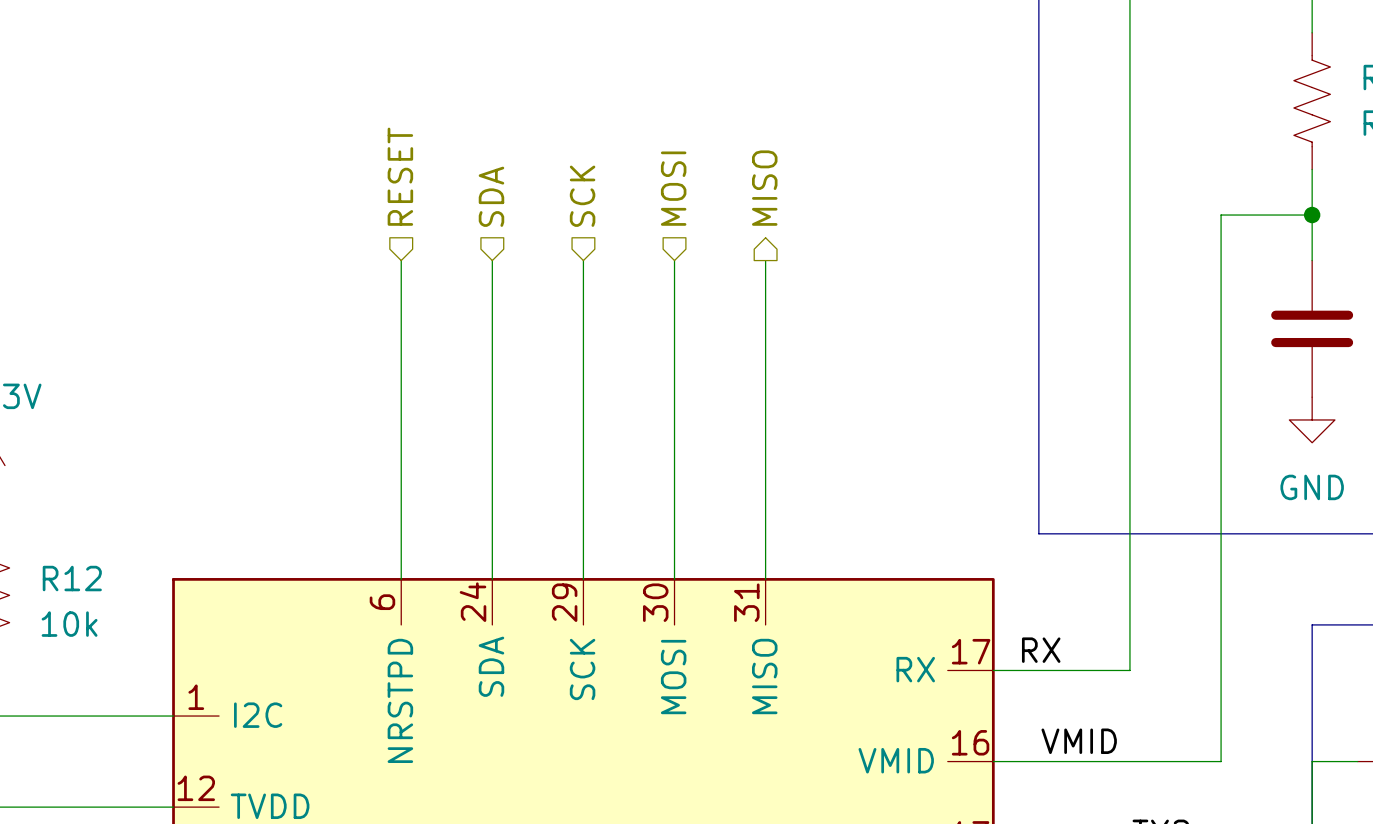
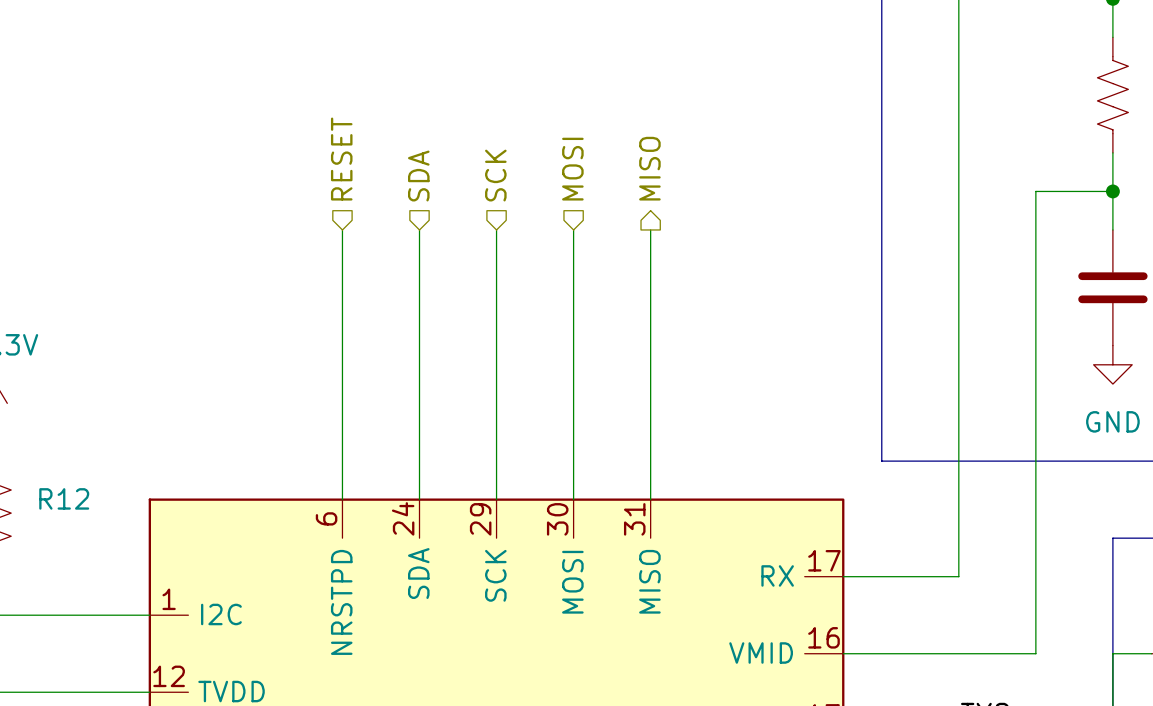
R12 value: 10k (69, 624) -> none
label: RX (1041, 650) -> none
label: VMID (1079, 741) -> none

